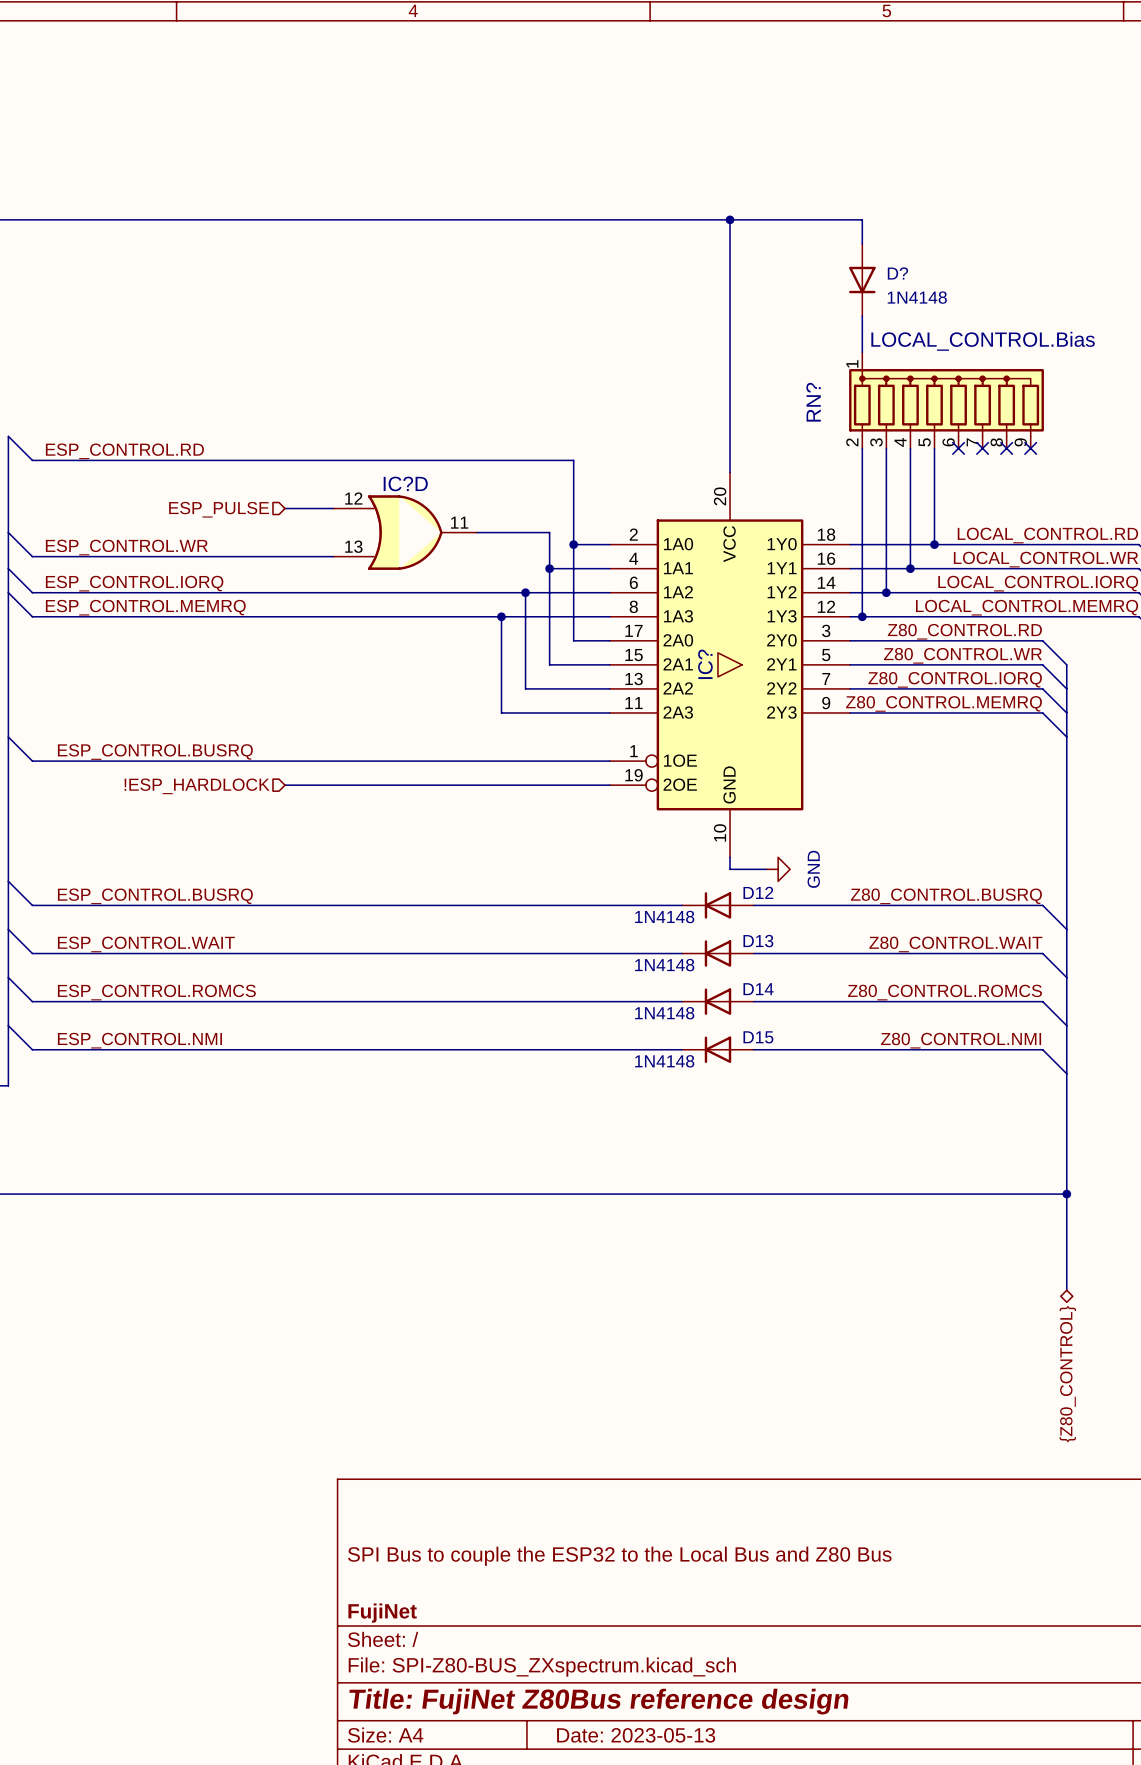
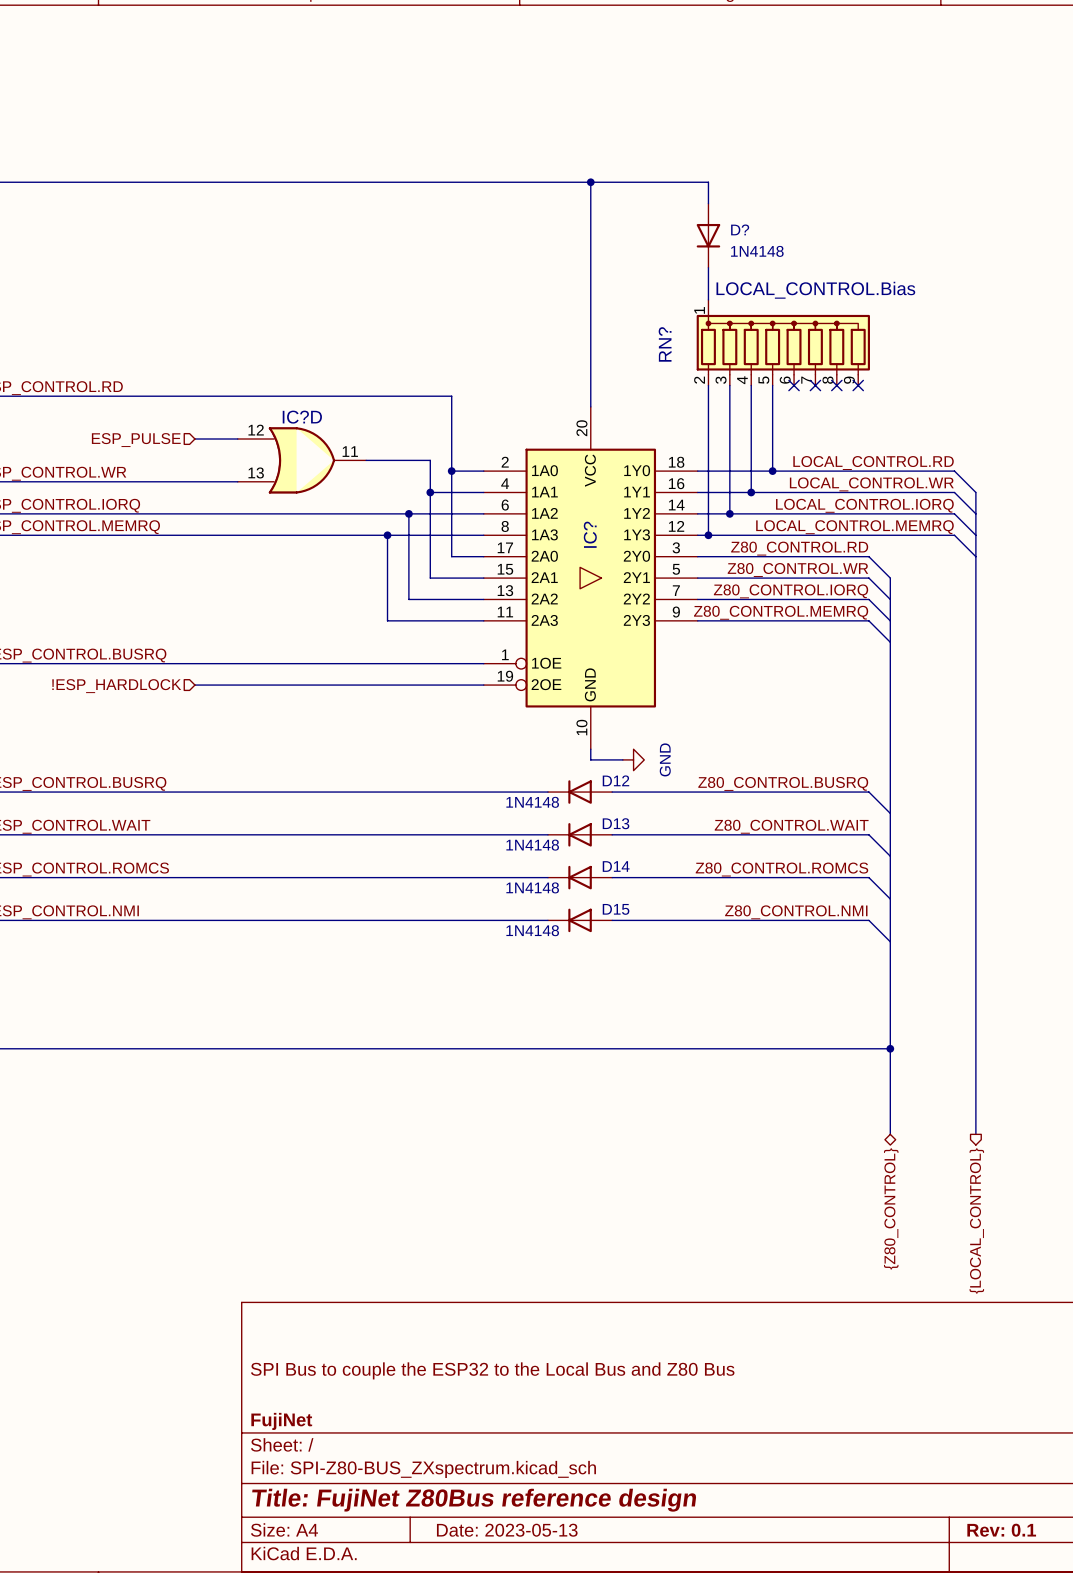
IC? name position: IC? (705, 664) -> IC? (590, 534)

